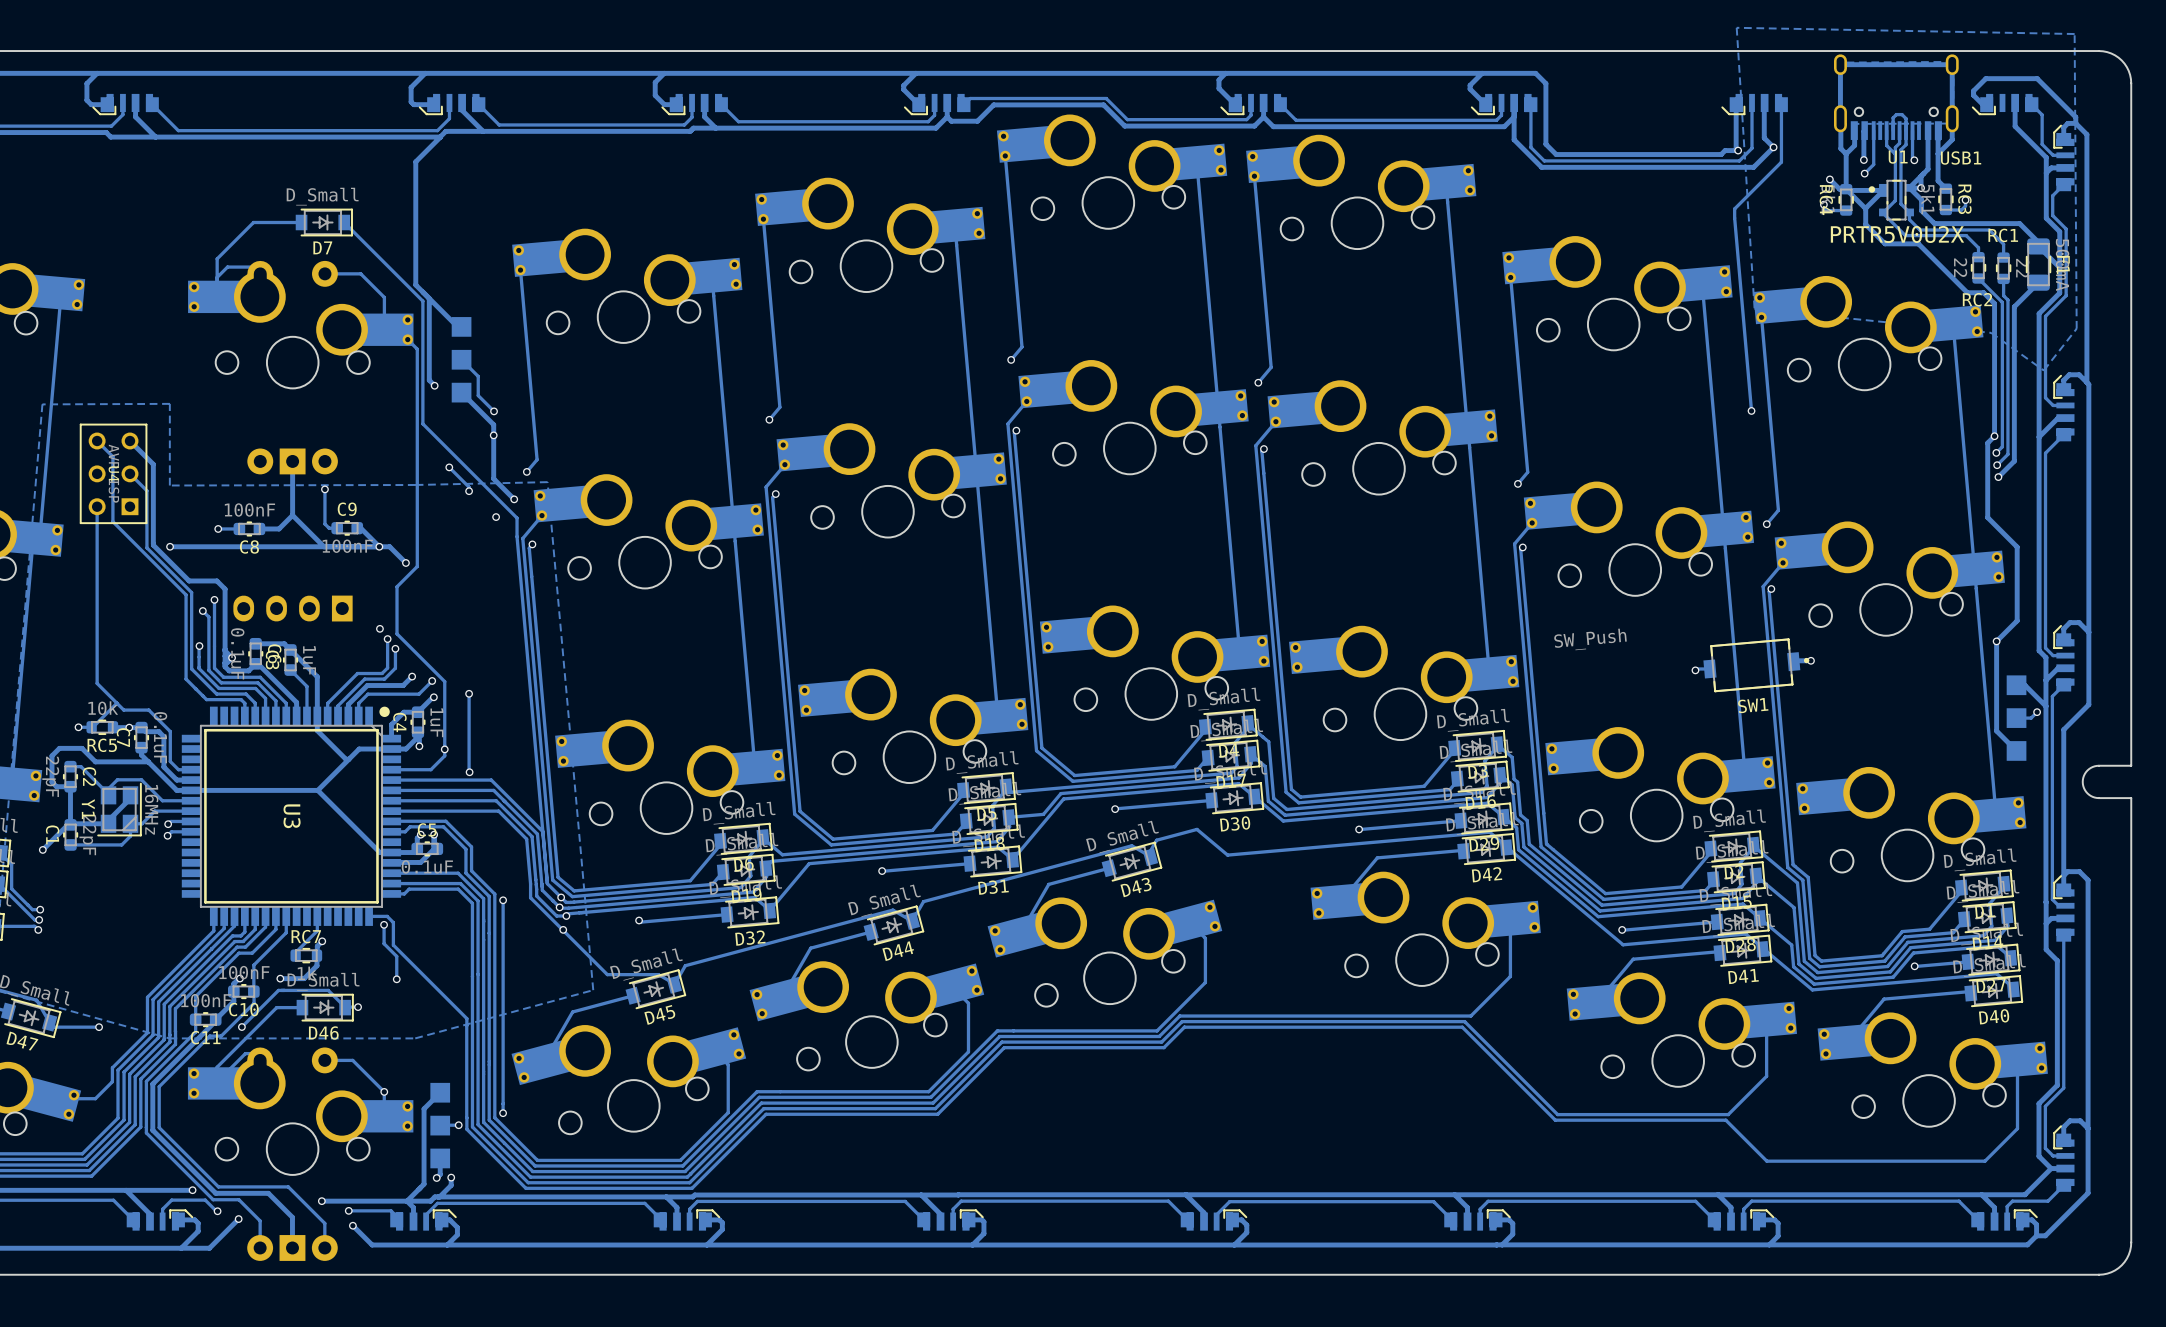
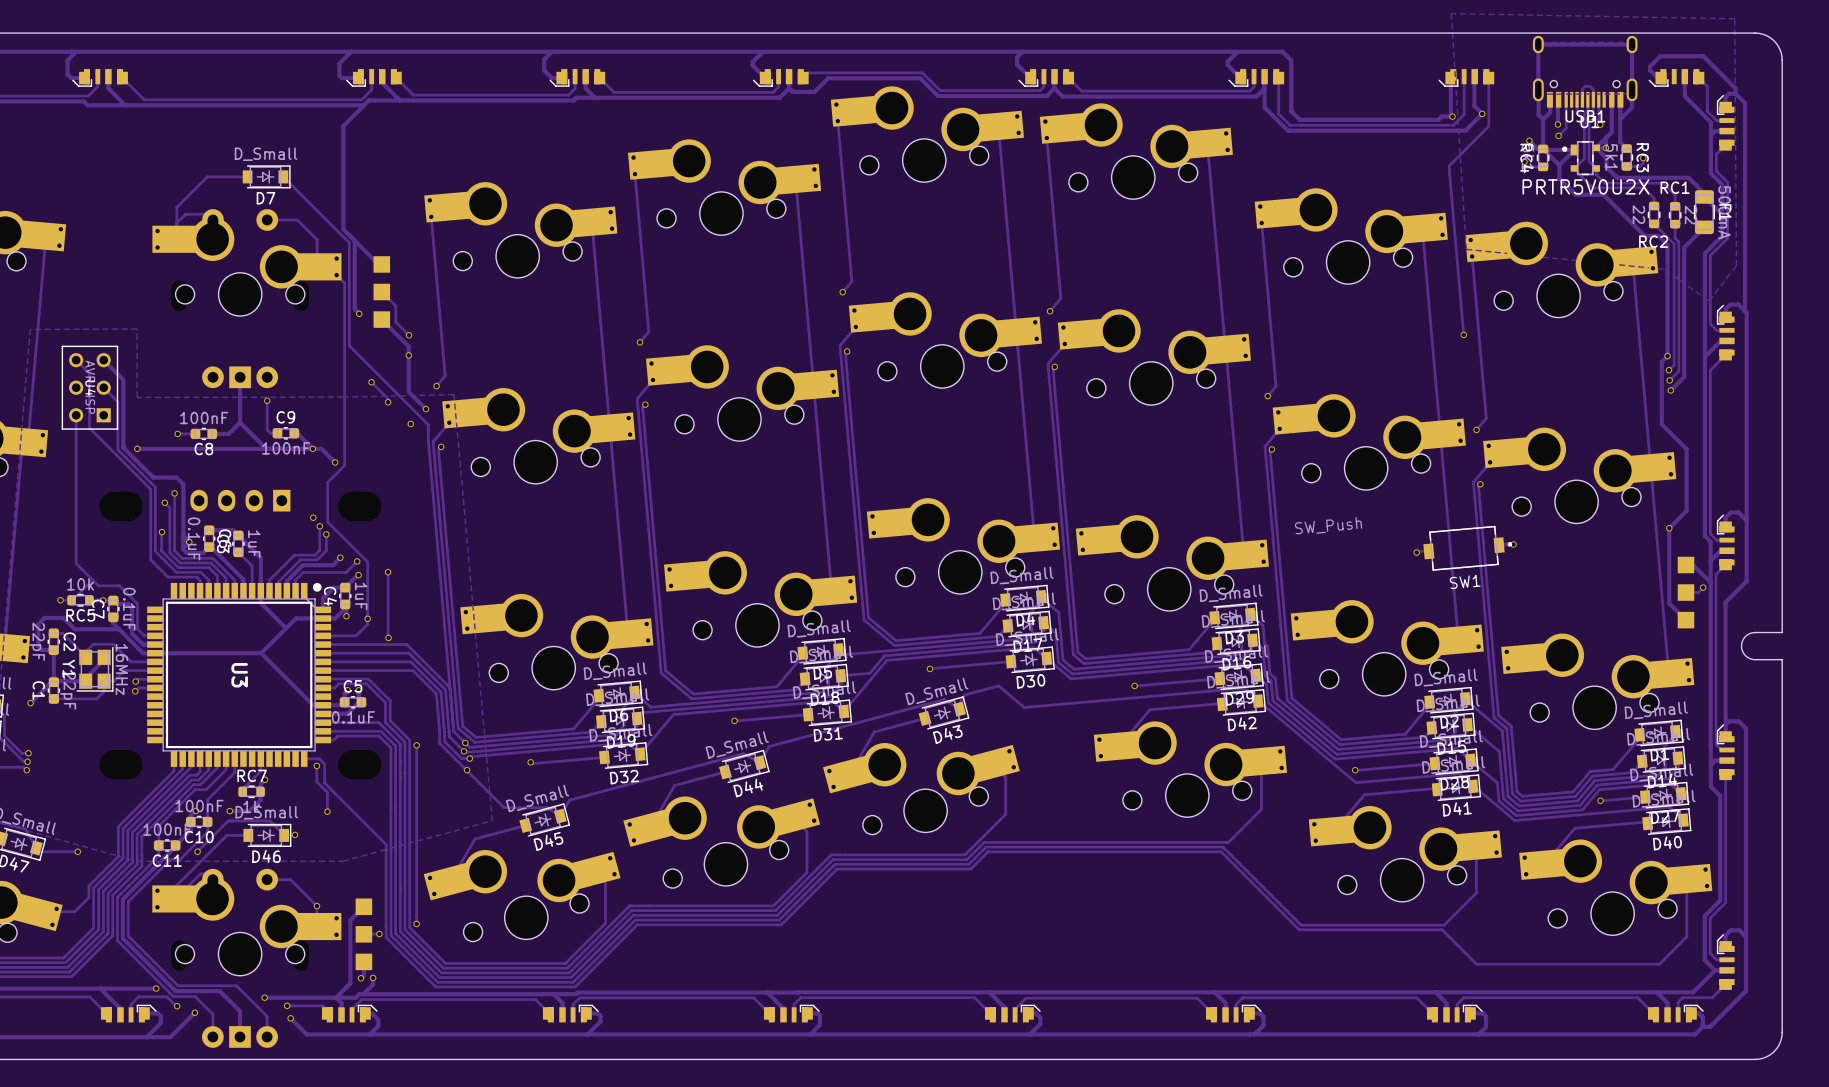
USB1 name position: USB1 (1961, 157) -> USB1 (1585, 116)

